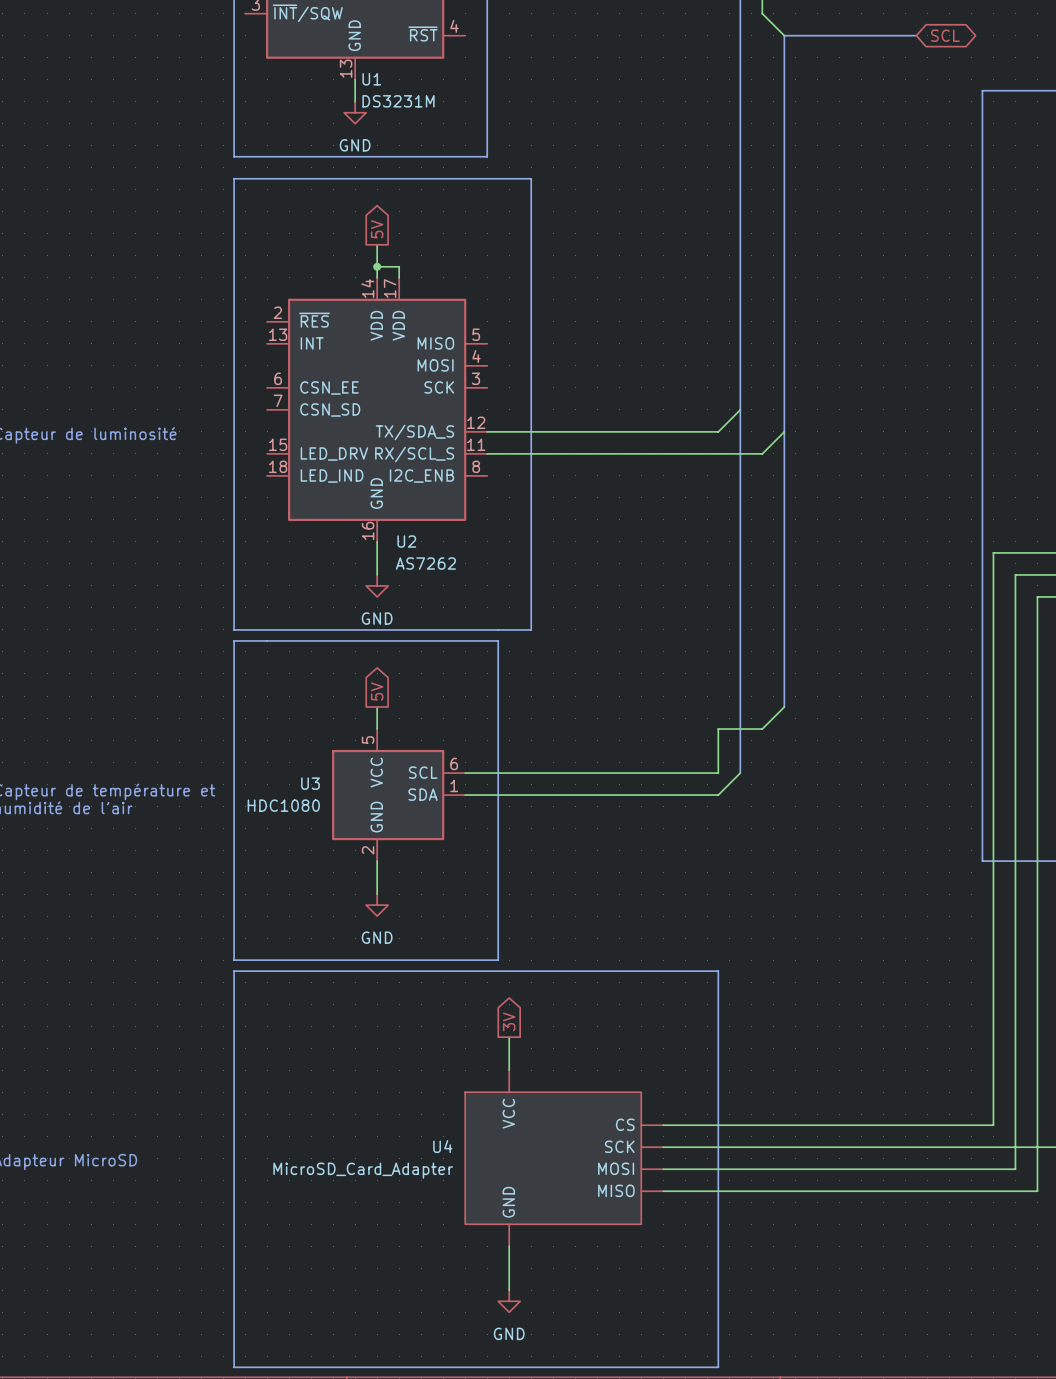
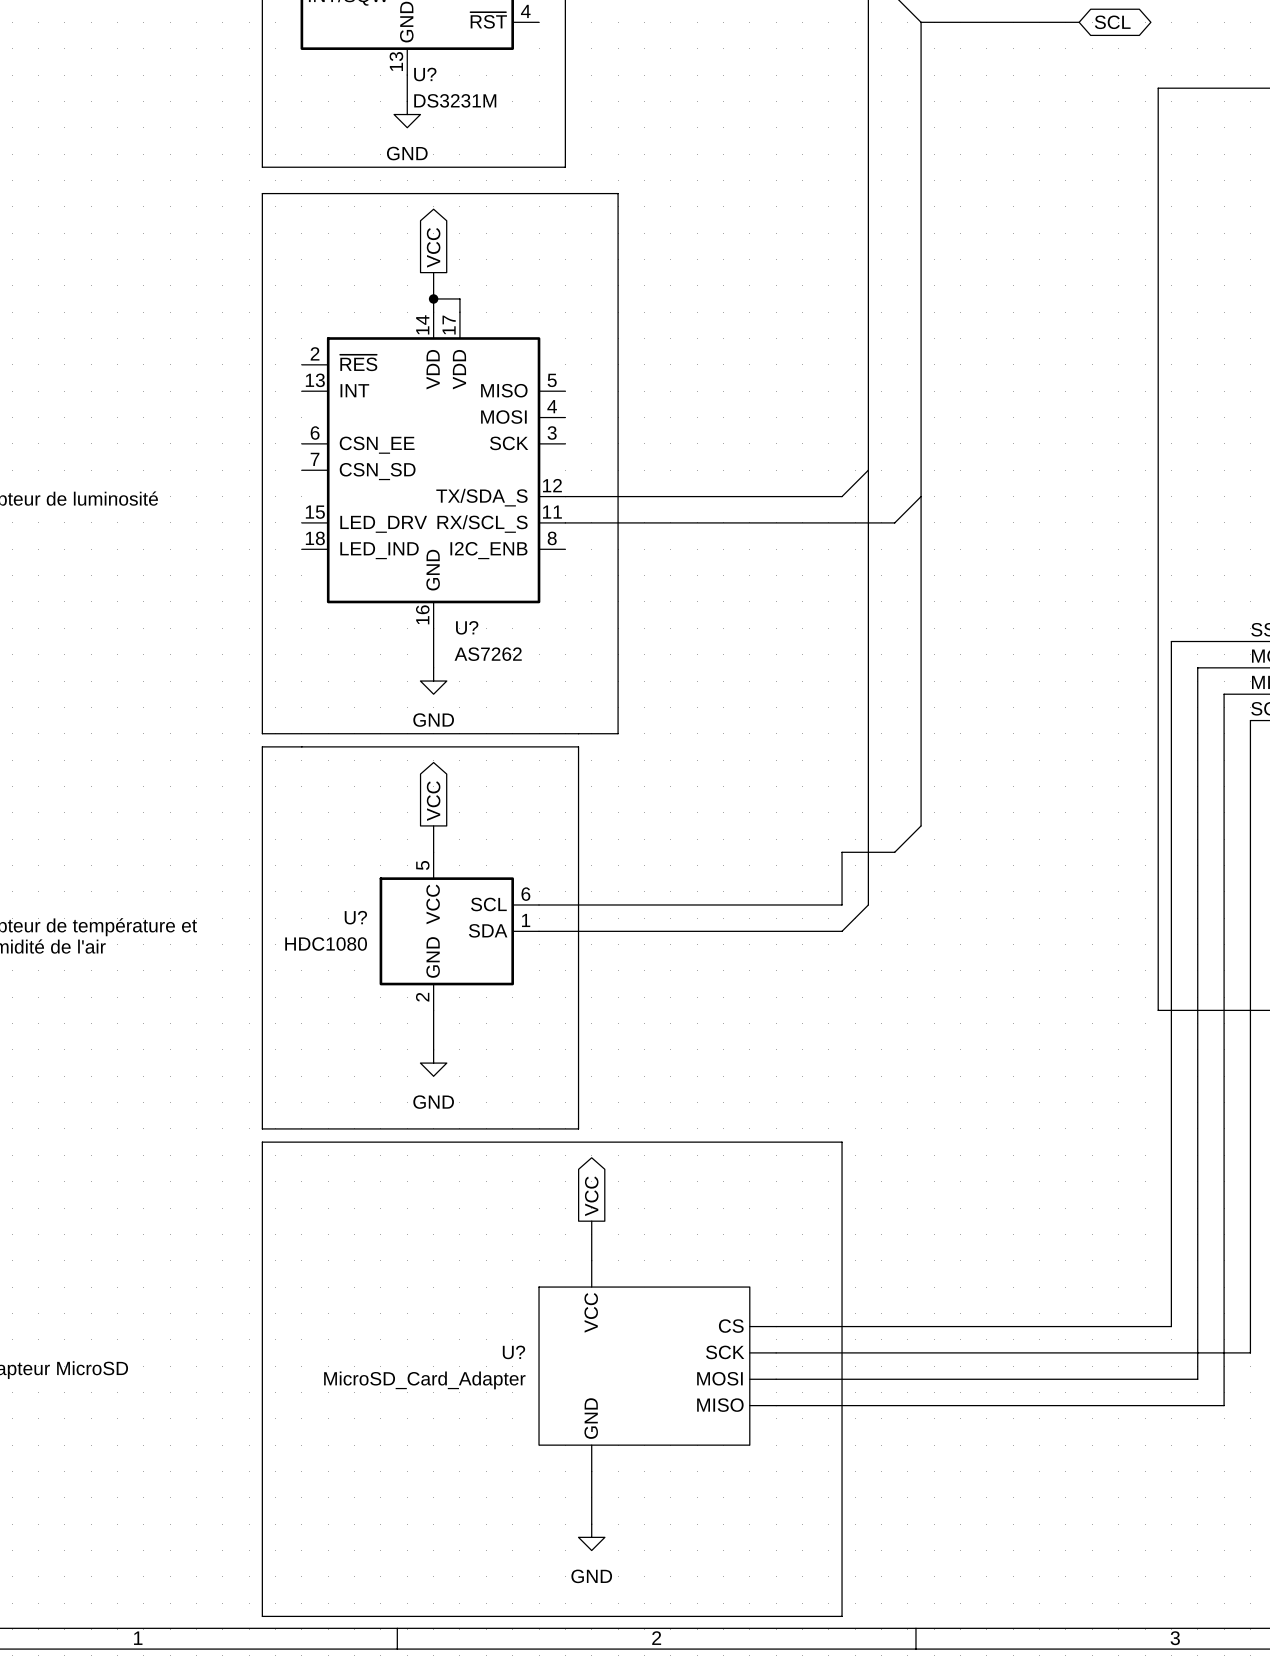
U1 name: U1 (371, 79) -> U? (425, 74)
global label: 5V (377, 229) -> VCC (433, 247)
U2 name: U2 (406, 541) -> U? (467, 627)
global label: 5V (377, 691) -> VCC (433, 801)
U3 name: U3 (310, 783) -> U? (355, 917)
global label: 3V (509, 1021) -> VCC (591, 1196)
U4 name: U4 (442, 1146) -> U? (513, 1352)

